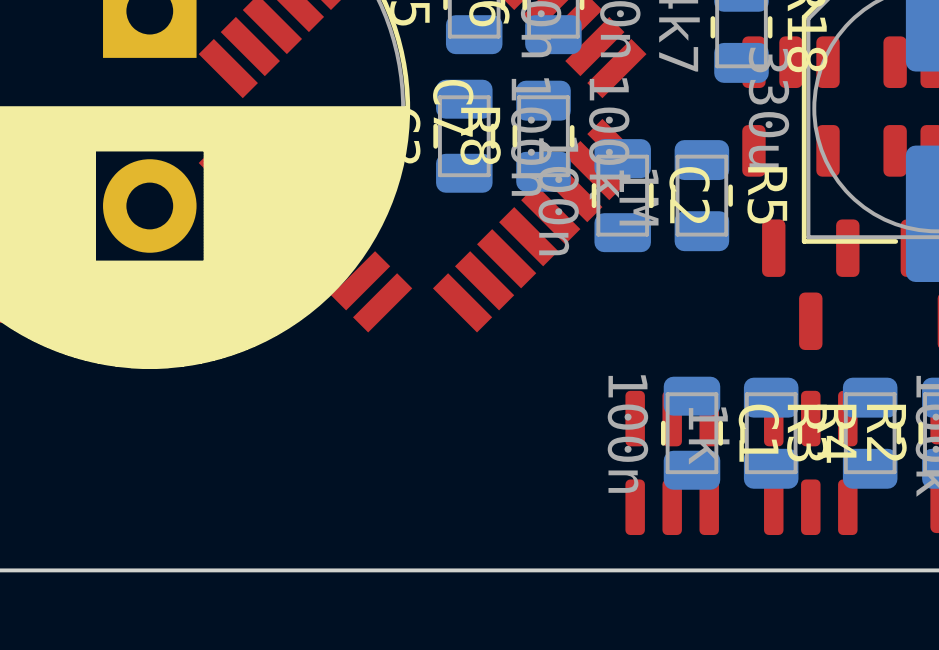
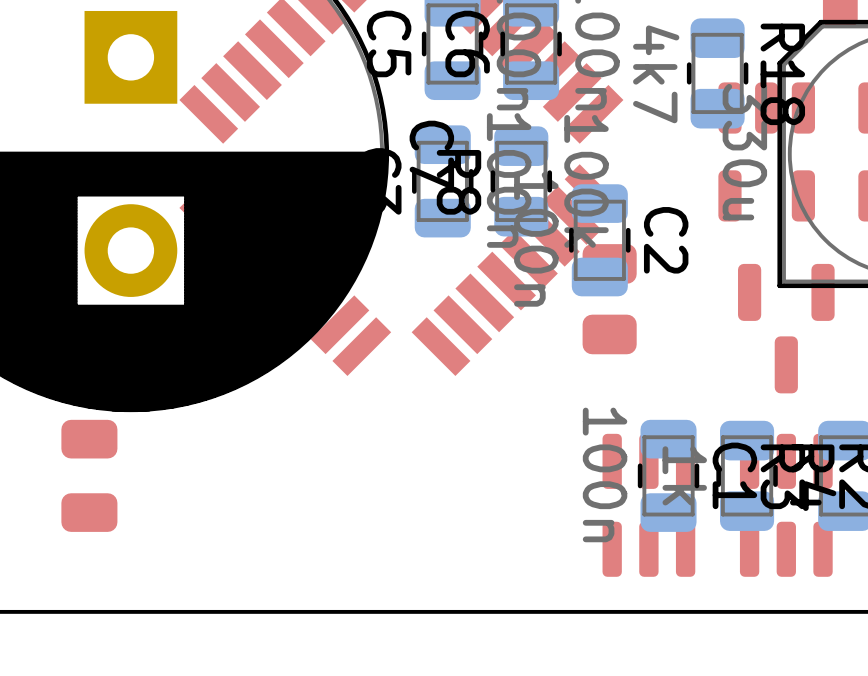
R5 side: bottom (701, 195) -> top (609, 299)
part: none -> (89, 475)

